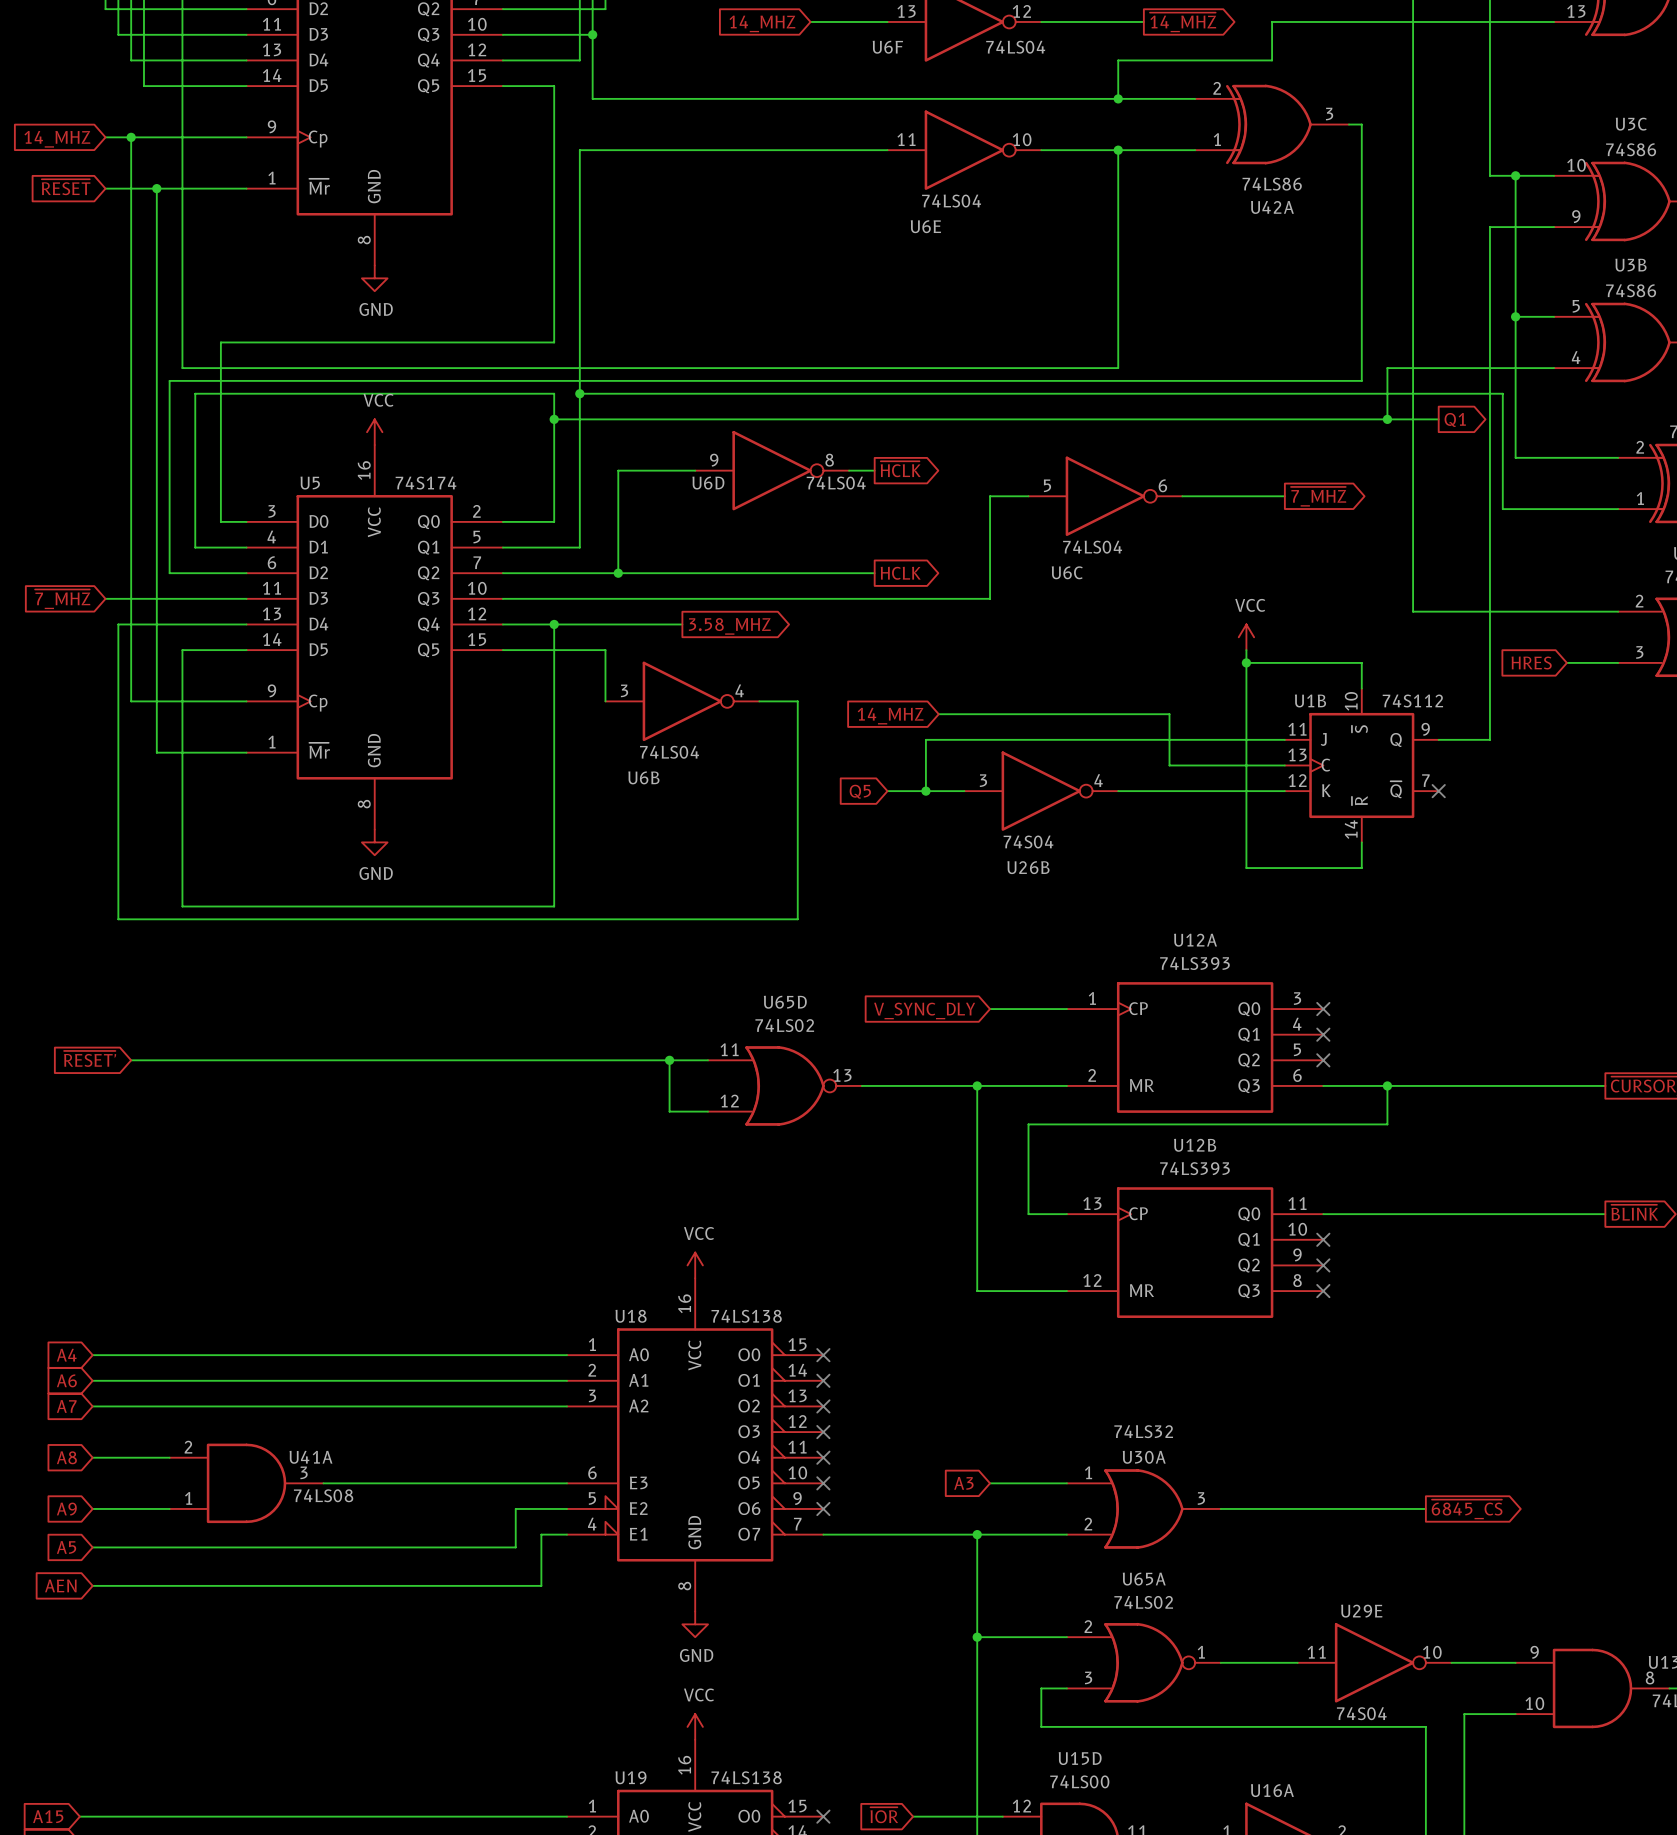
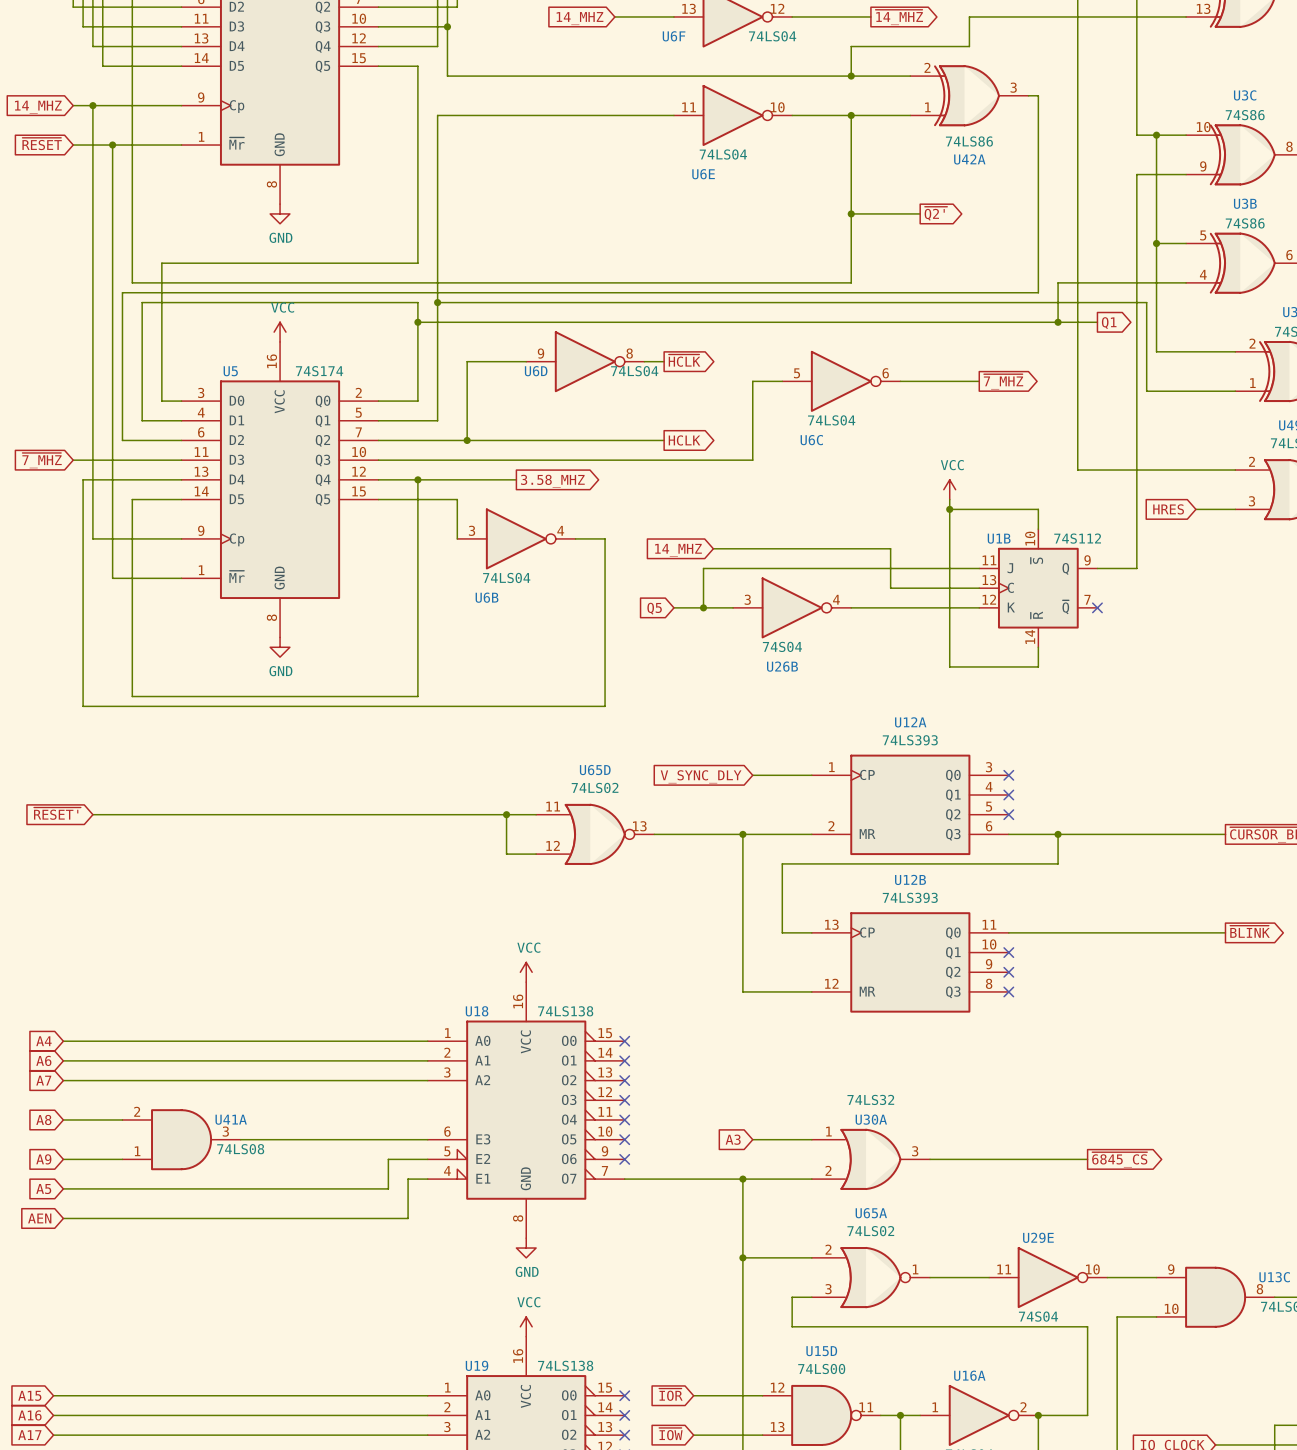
global label: none -> ~{Q2'} (935, 213)
wire: none -> (851, 213) (920, 213)
junction: none -> (851, 213)

